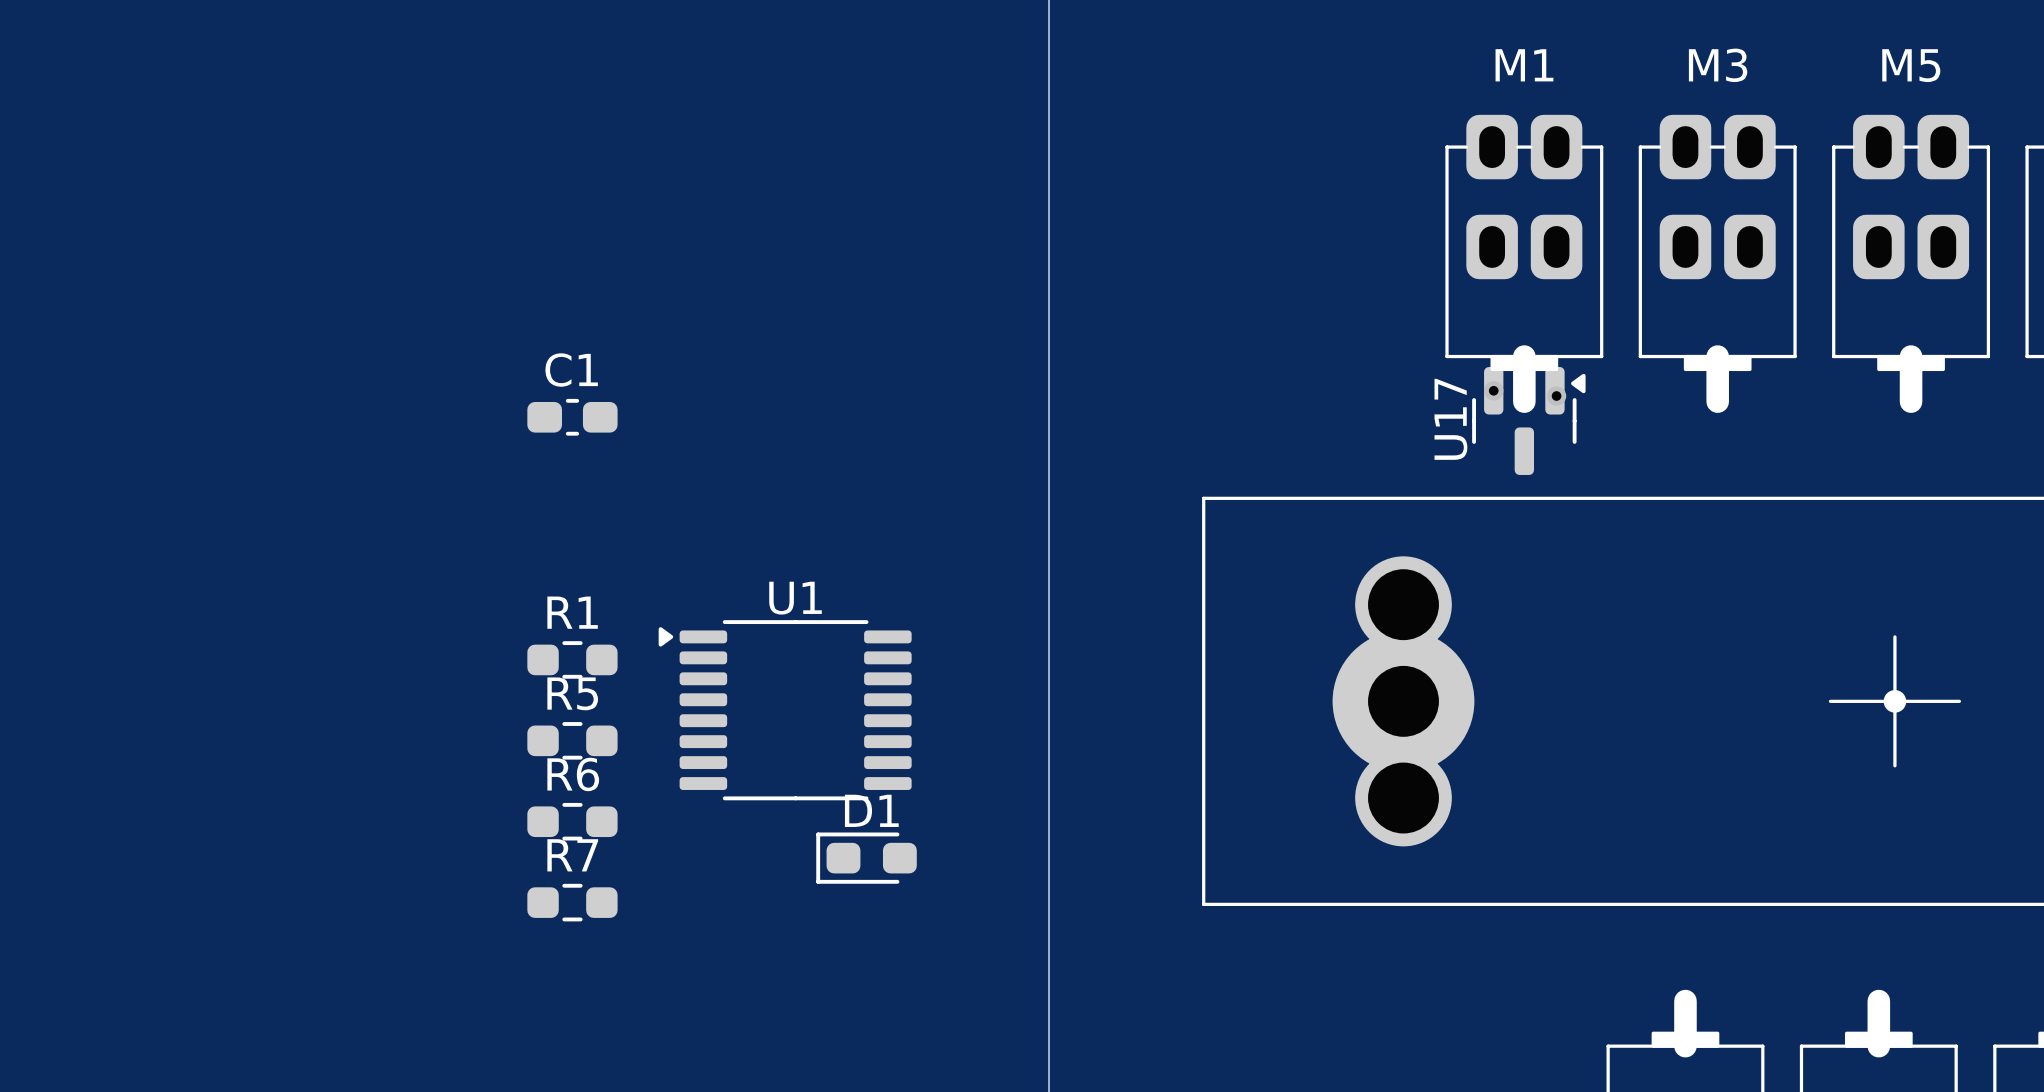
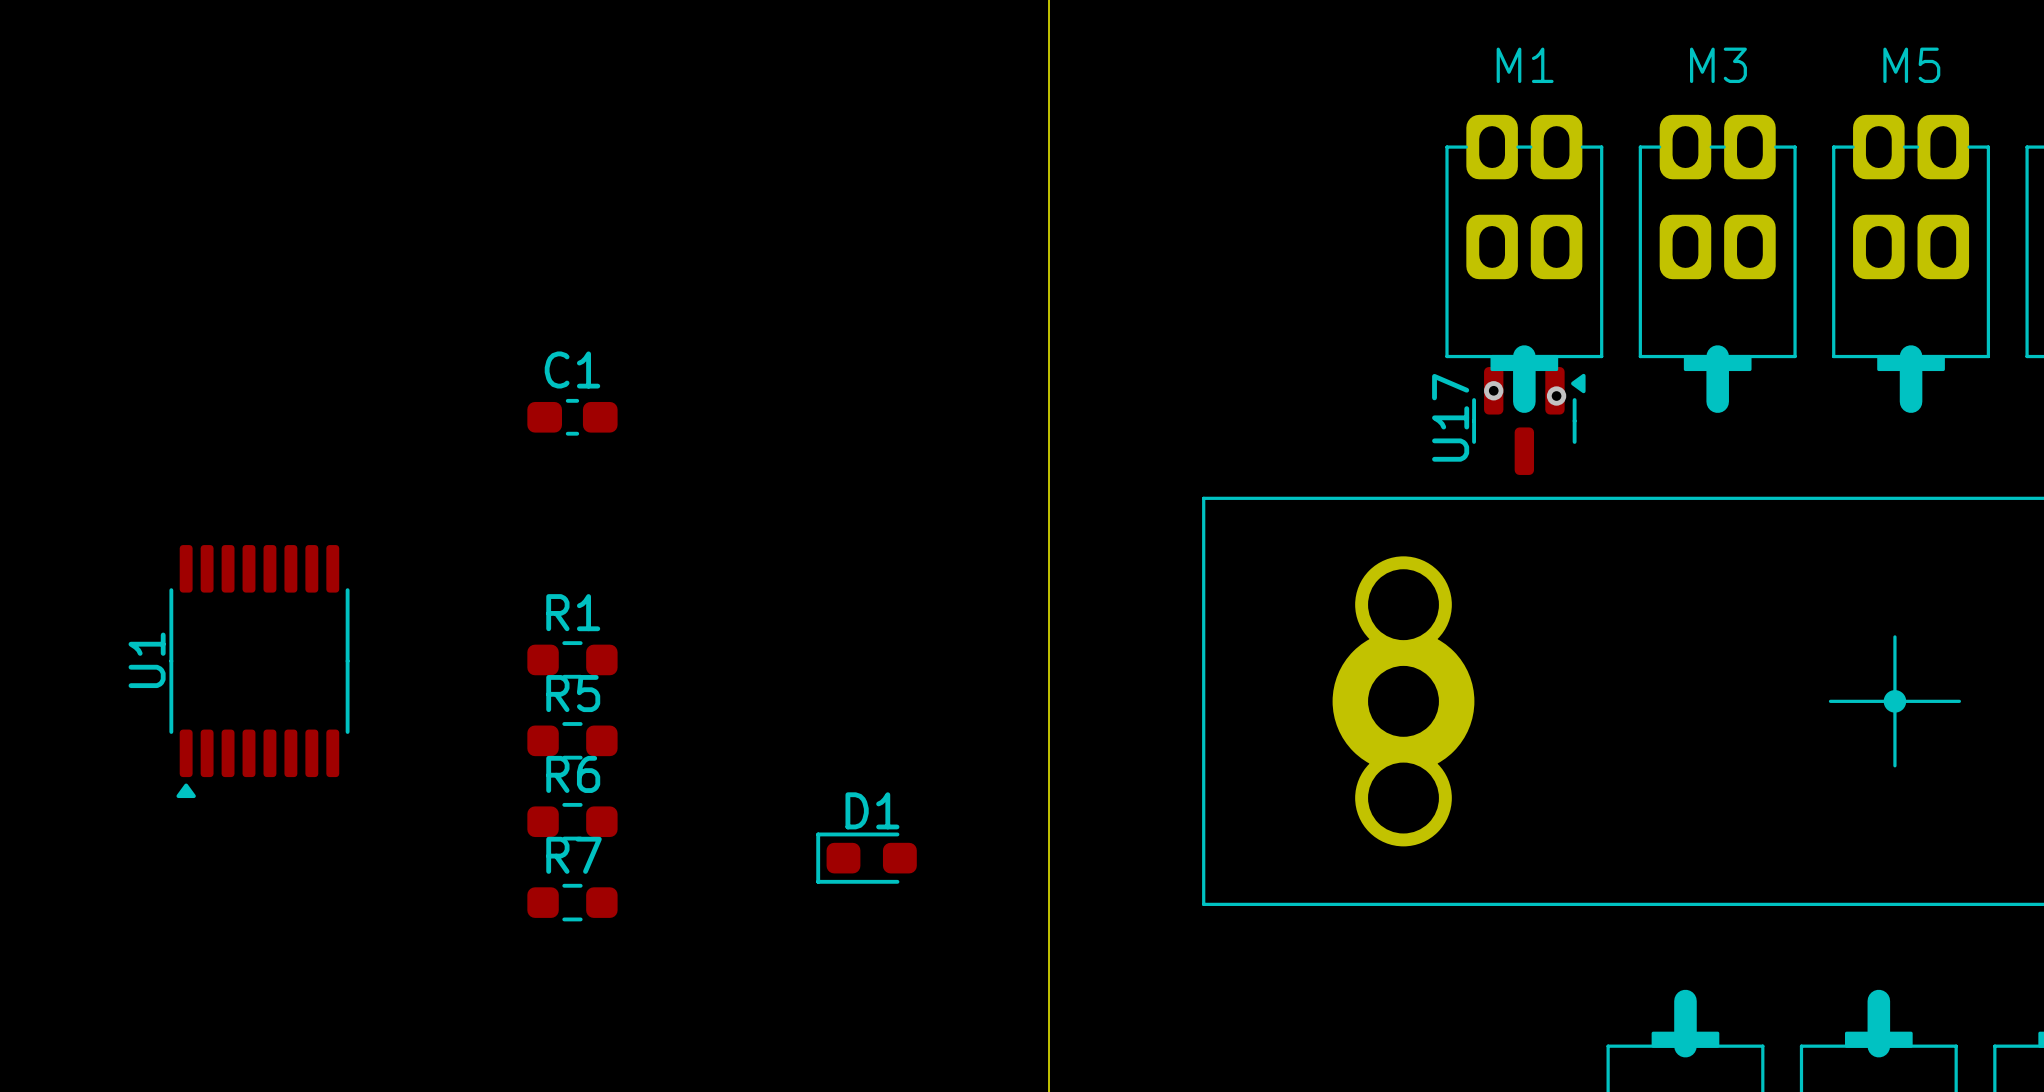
U1 rotation: 0° (785, 710) -> 90° counterclockwise (259, 671)
U1 position: (785, 710) -> (259, 671)

